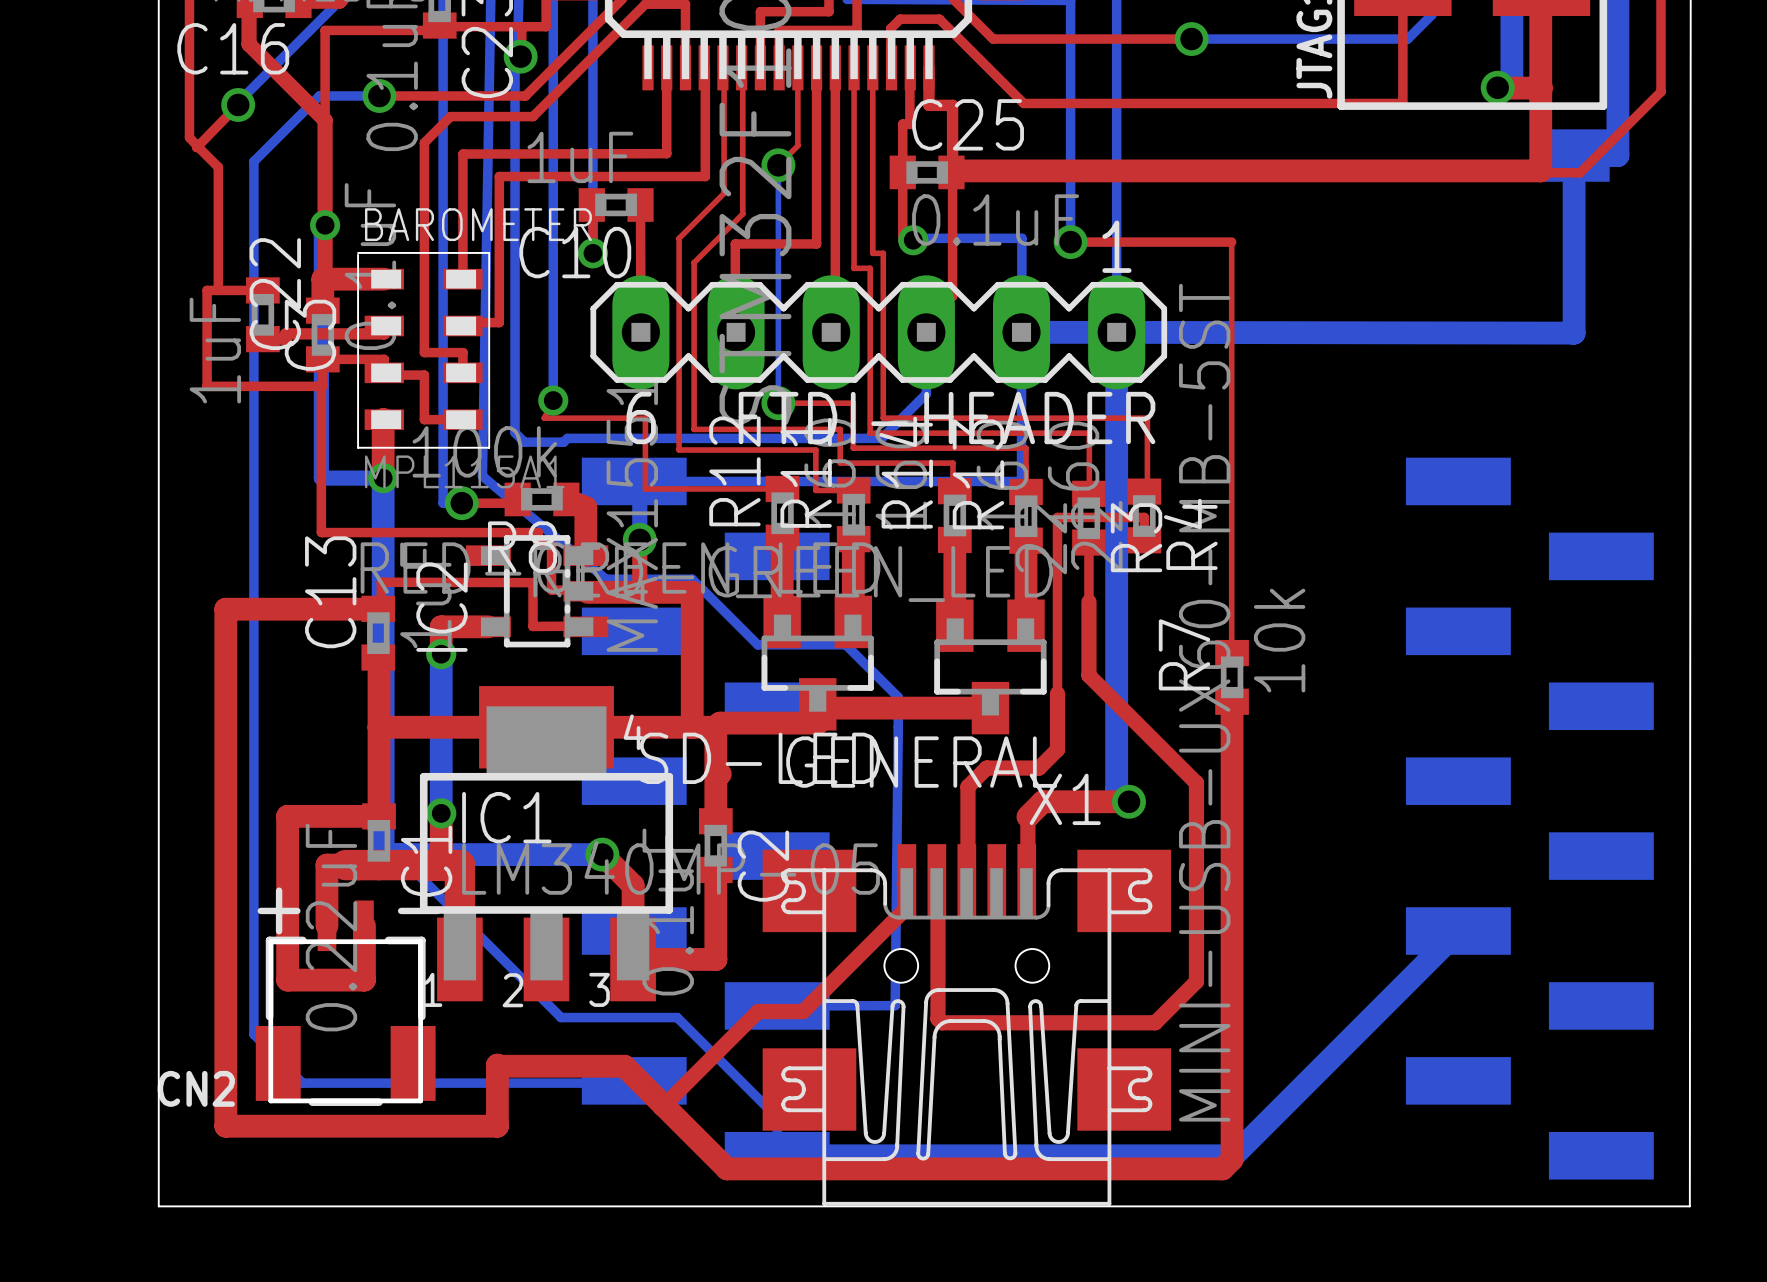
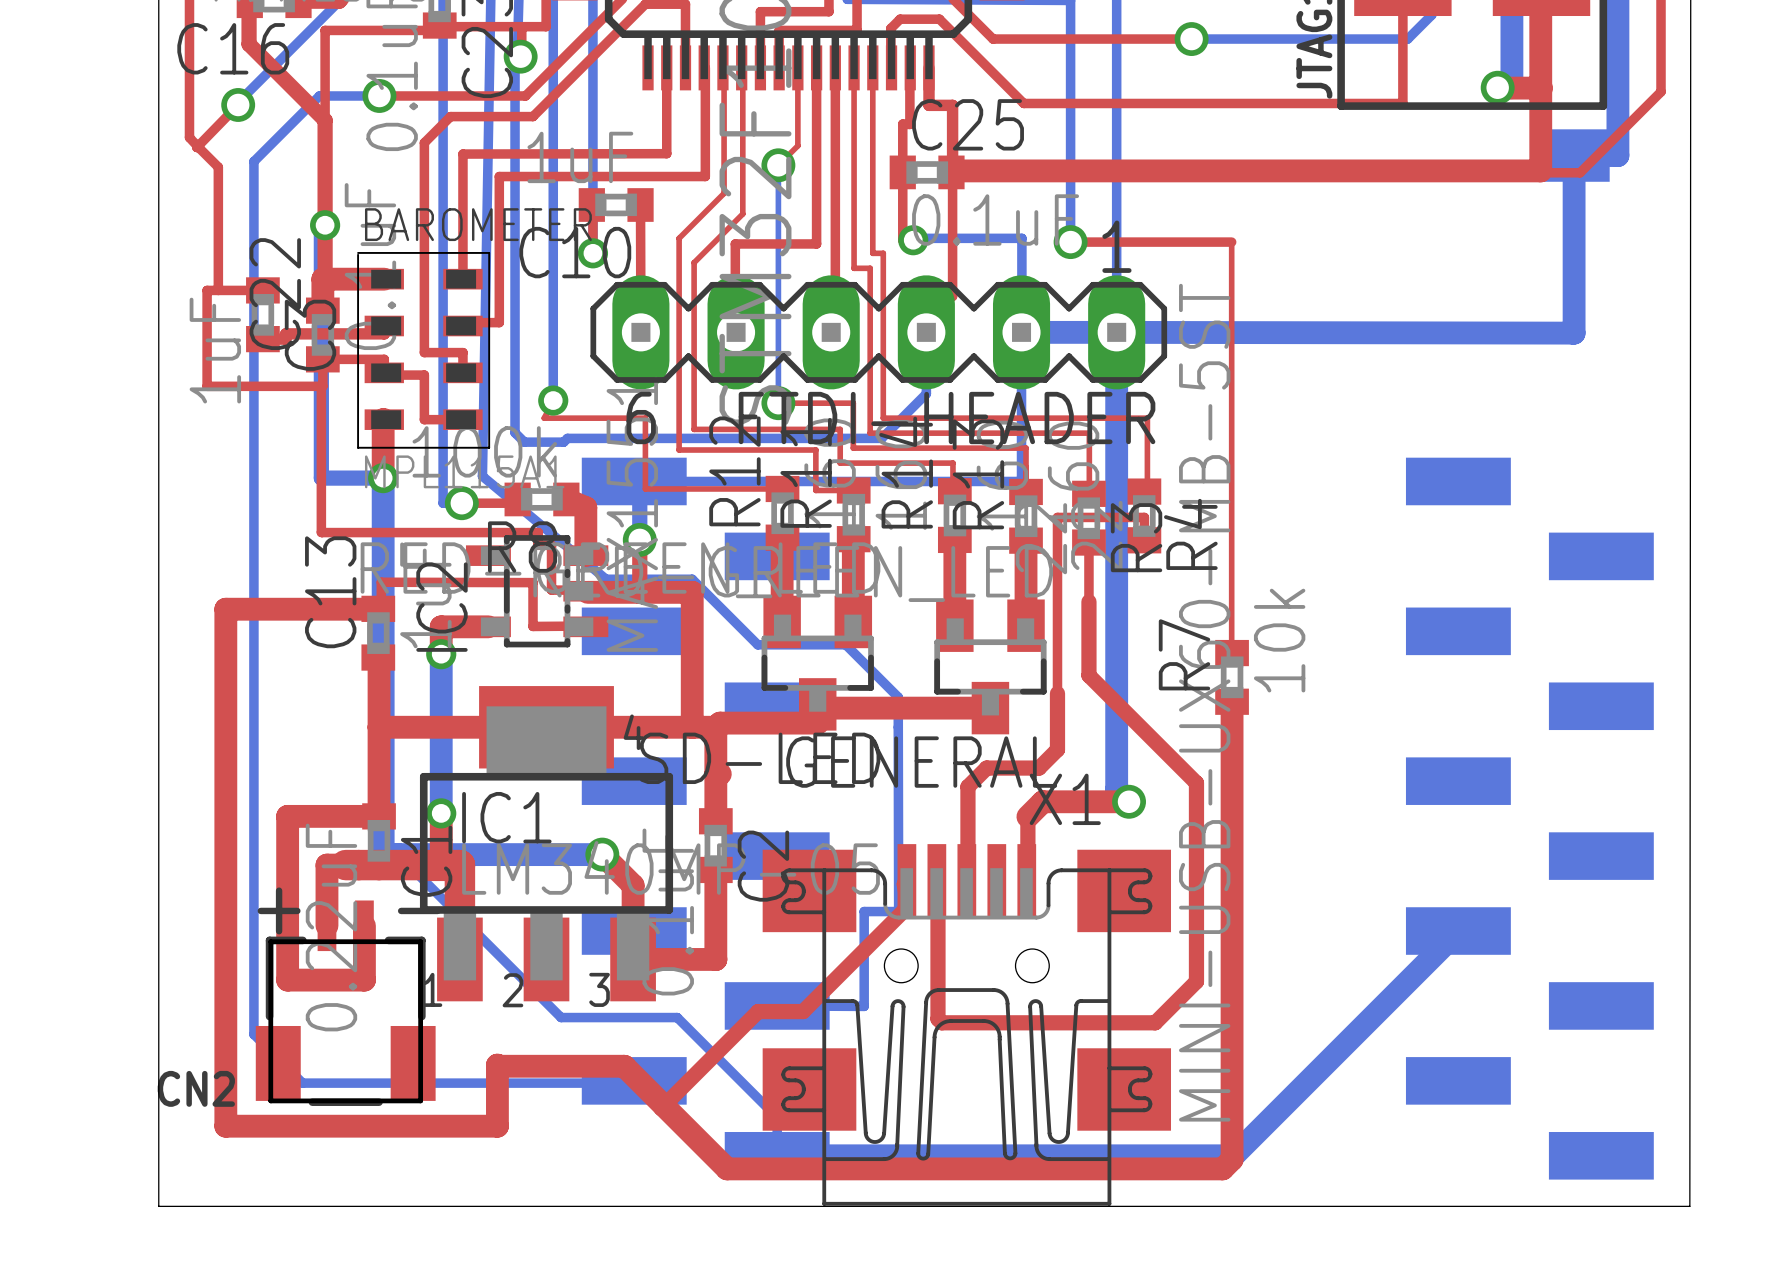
bottom track: (898, 727) (895, 1005) (777, 1005) -> (898, 727) (898, 912) (864, 911) (864, 1006) (777, 1005)

